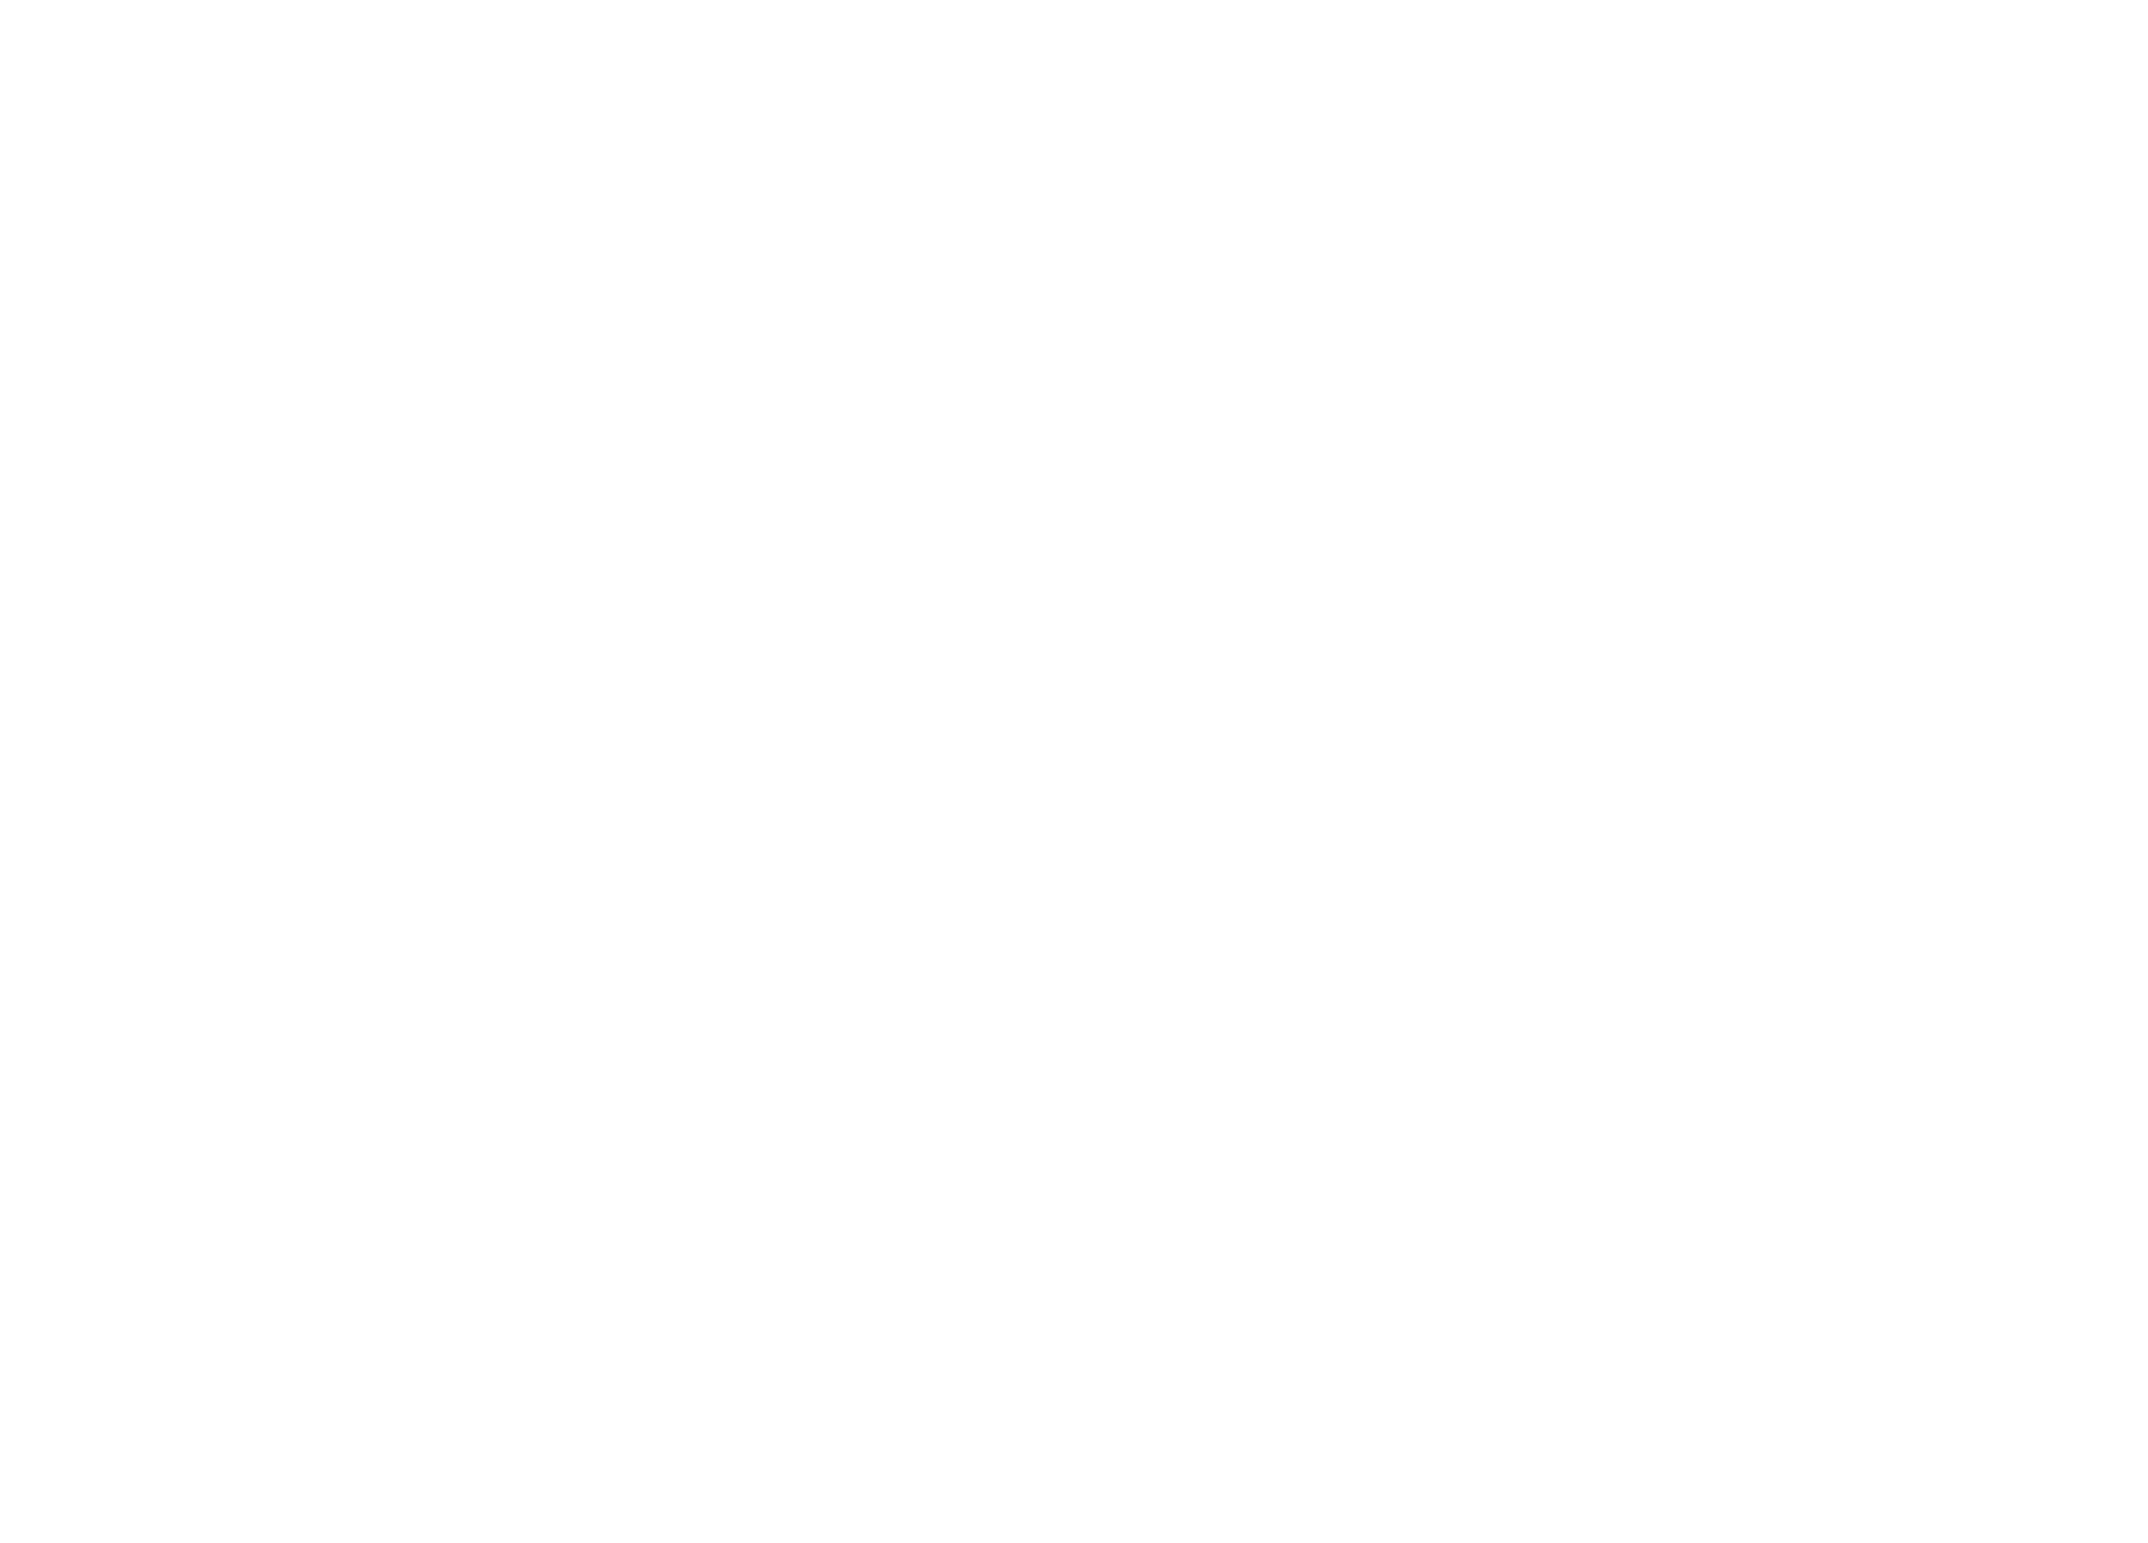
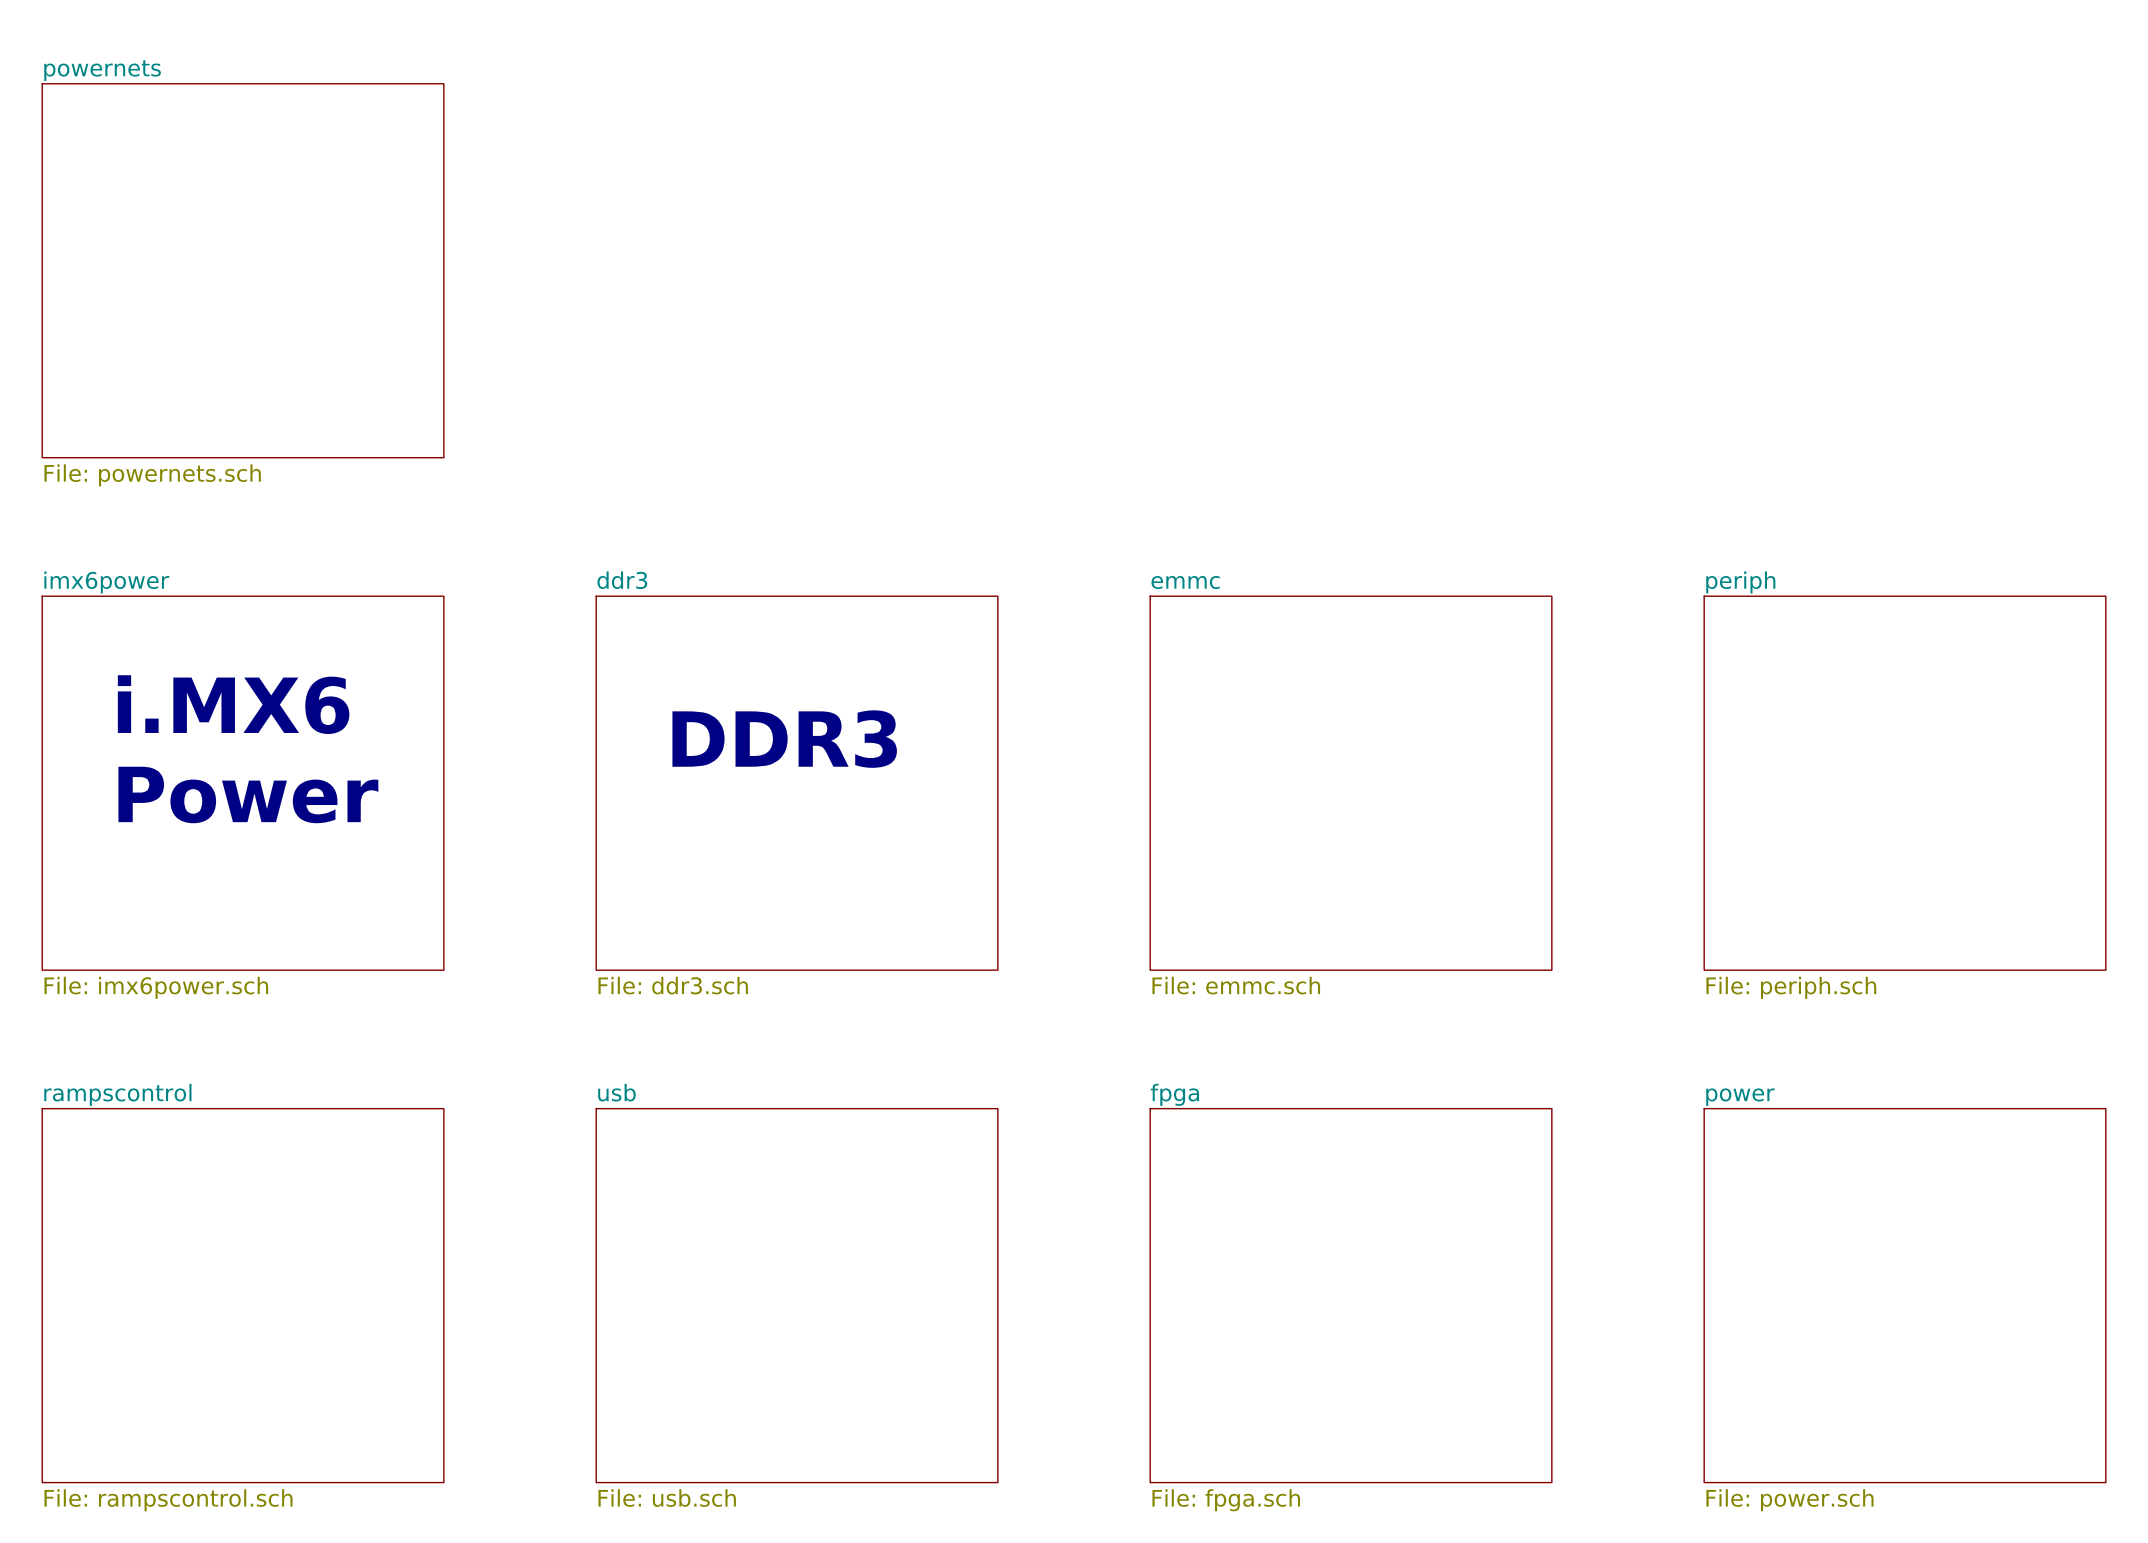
sheet powernets: none -> File: powernets.sch (243, 270)
text: none -> i.MX6 (233, 704)
text: none -> DDR3 (784, 739)
sheet imx6power: none -> File: imx6power.sch (243, 783)
sheet ddr3: none -> File: ddr3.sch (797, 783)
sheet emmc: none -> File: emmc.sch (1351, 783)
sheet periph: none -> File: periph.sch (1905, 783)
text: none -> Power (248, 794)
sheet rampscontrol: none -> File: rampscontrol.sch (243, 1295)
sheet usb: none -> File: usb.sch (797, 1295)
sheet fpga: none -> File: fpga.sch (1351, 1295)
sheet power: none -> File: power.sch (1905, 1295)

